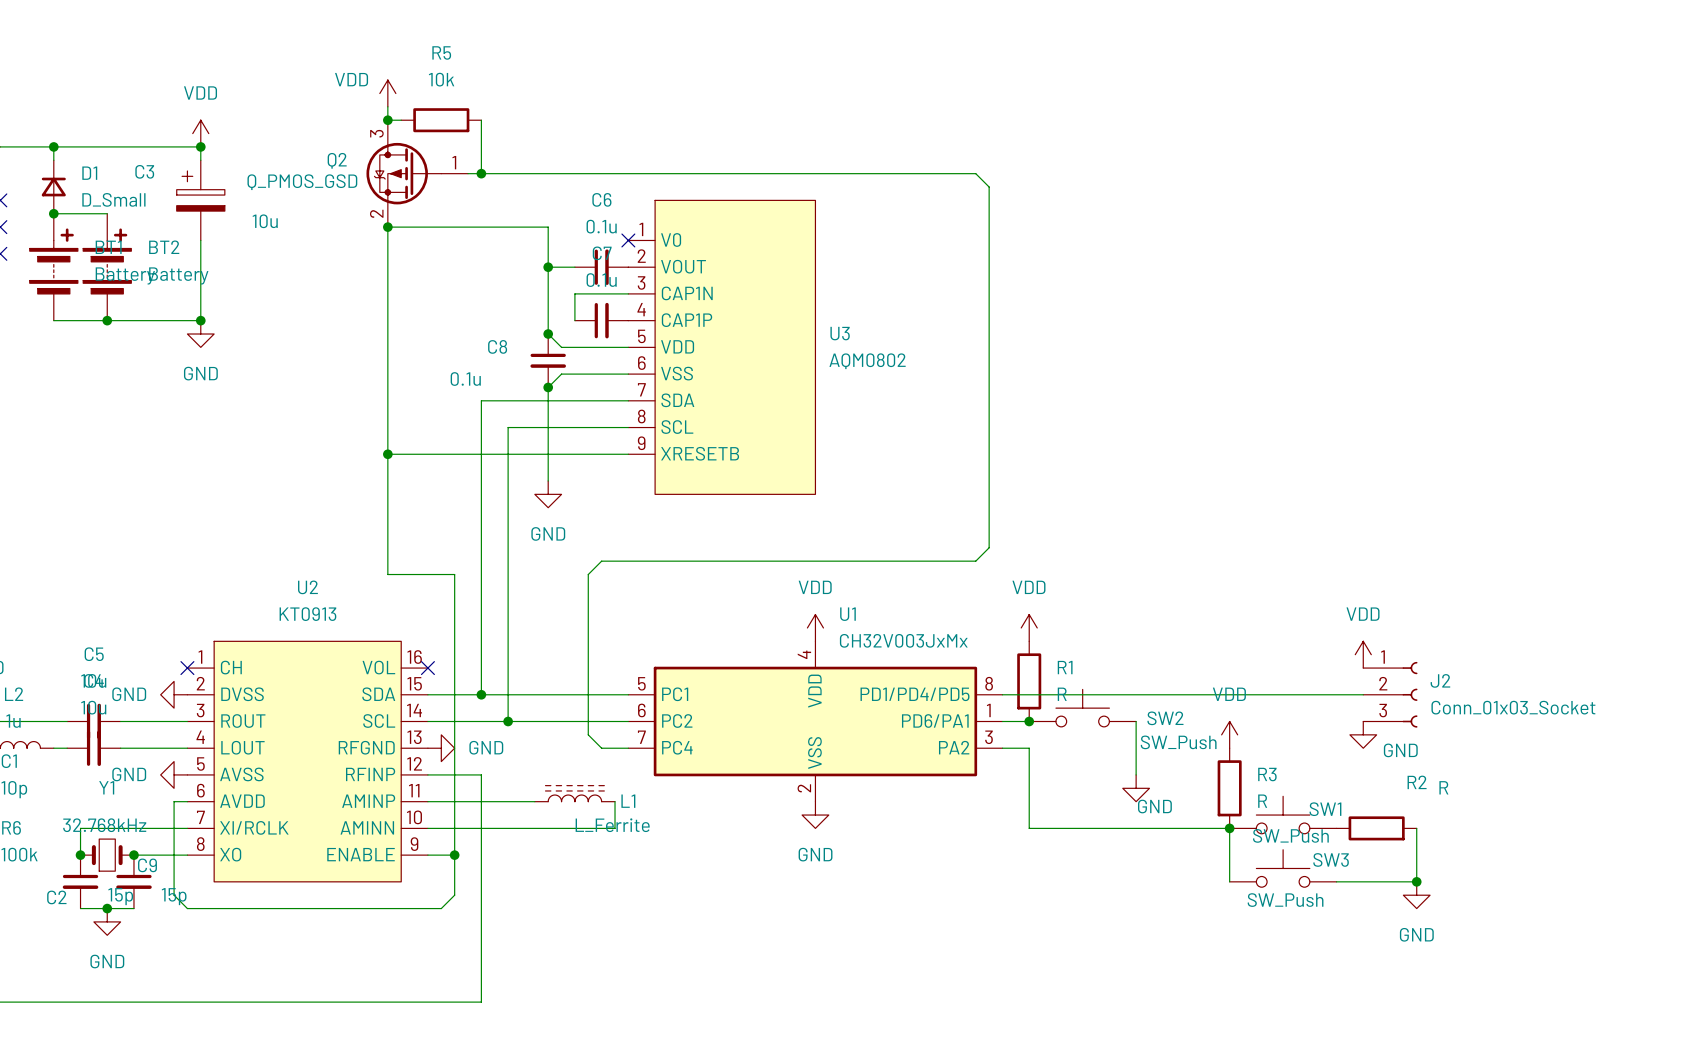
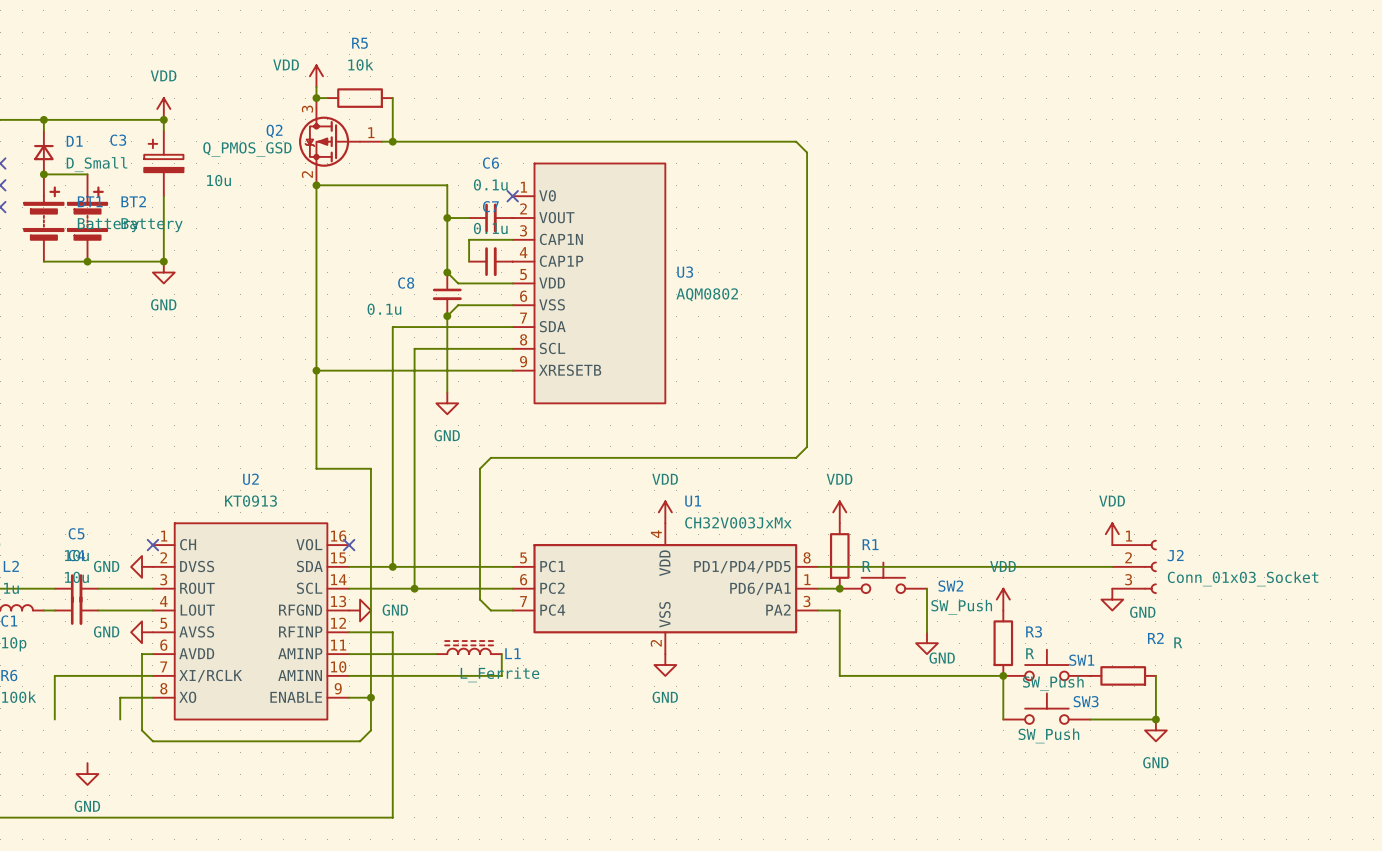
wire: (80, 828) (80, 855) -> (65, 675) (54, 675) (54, 719)
junction: (80, 855) -> none
Y1: 32.768kHz (107, 855) -> none
wire: (133, 855) (147, 855) -> (120, 719) (120, 697)
junction: (133, 855) -> none
C2: 15p (80, 881) -> none
C9: 15p (133, 881) -> none
wire: (80, 908) (133, 908) -> none
junction: (107, 908) -> none
power symbol position: GND (107, 921) -> GND (87, 774)

